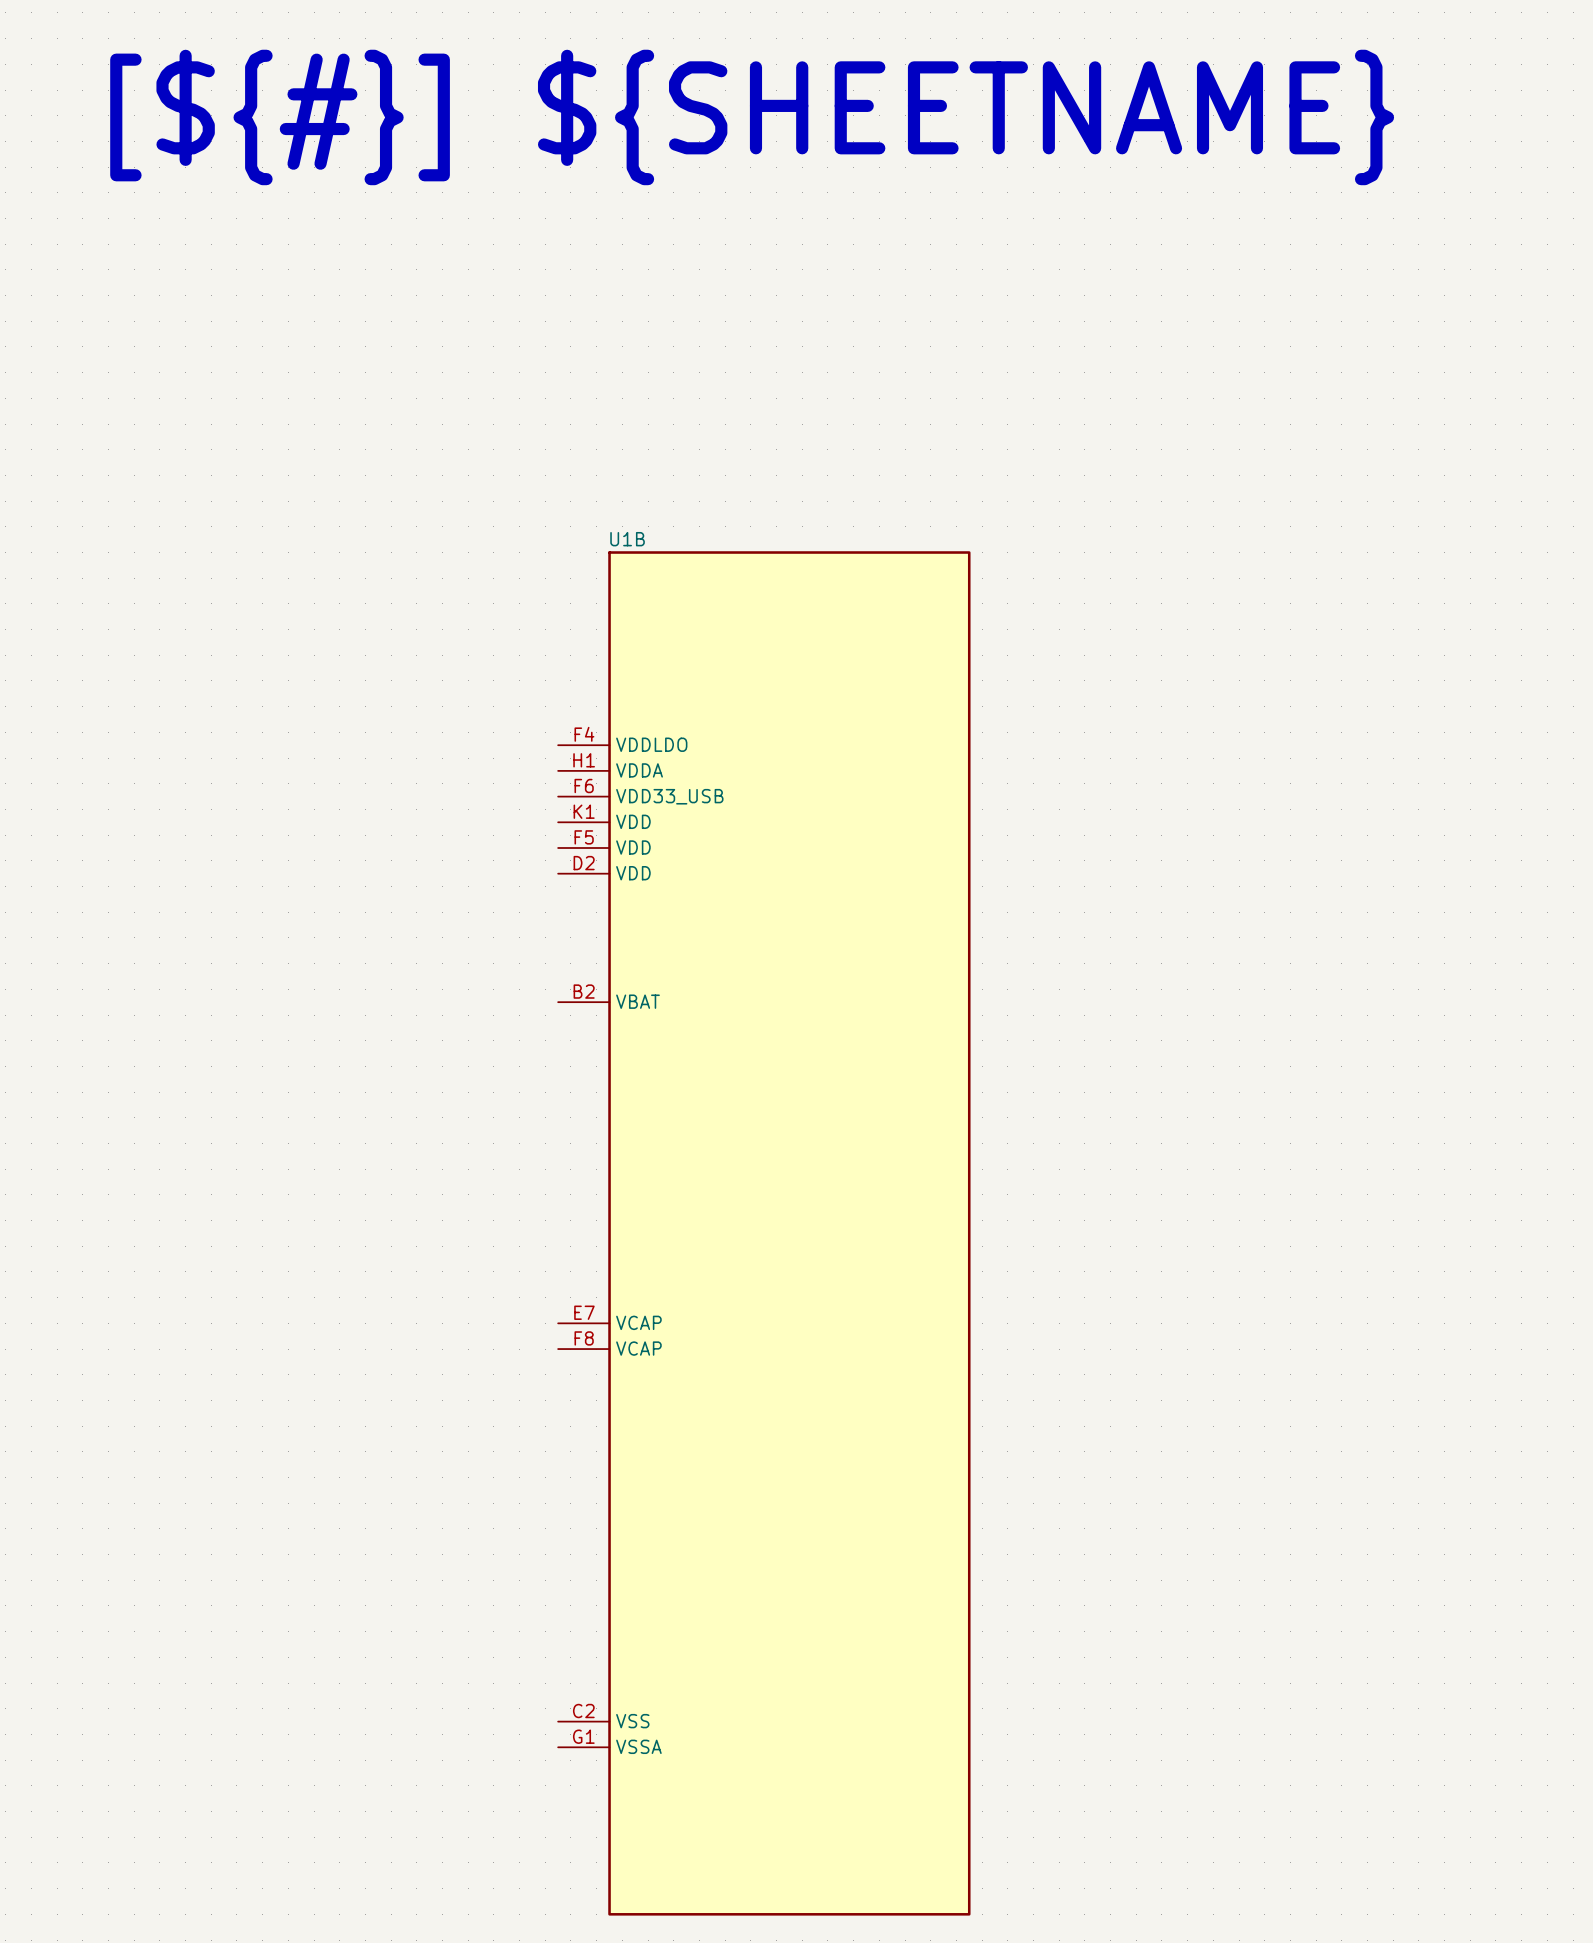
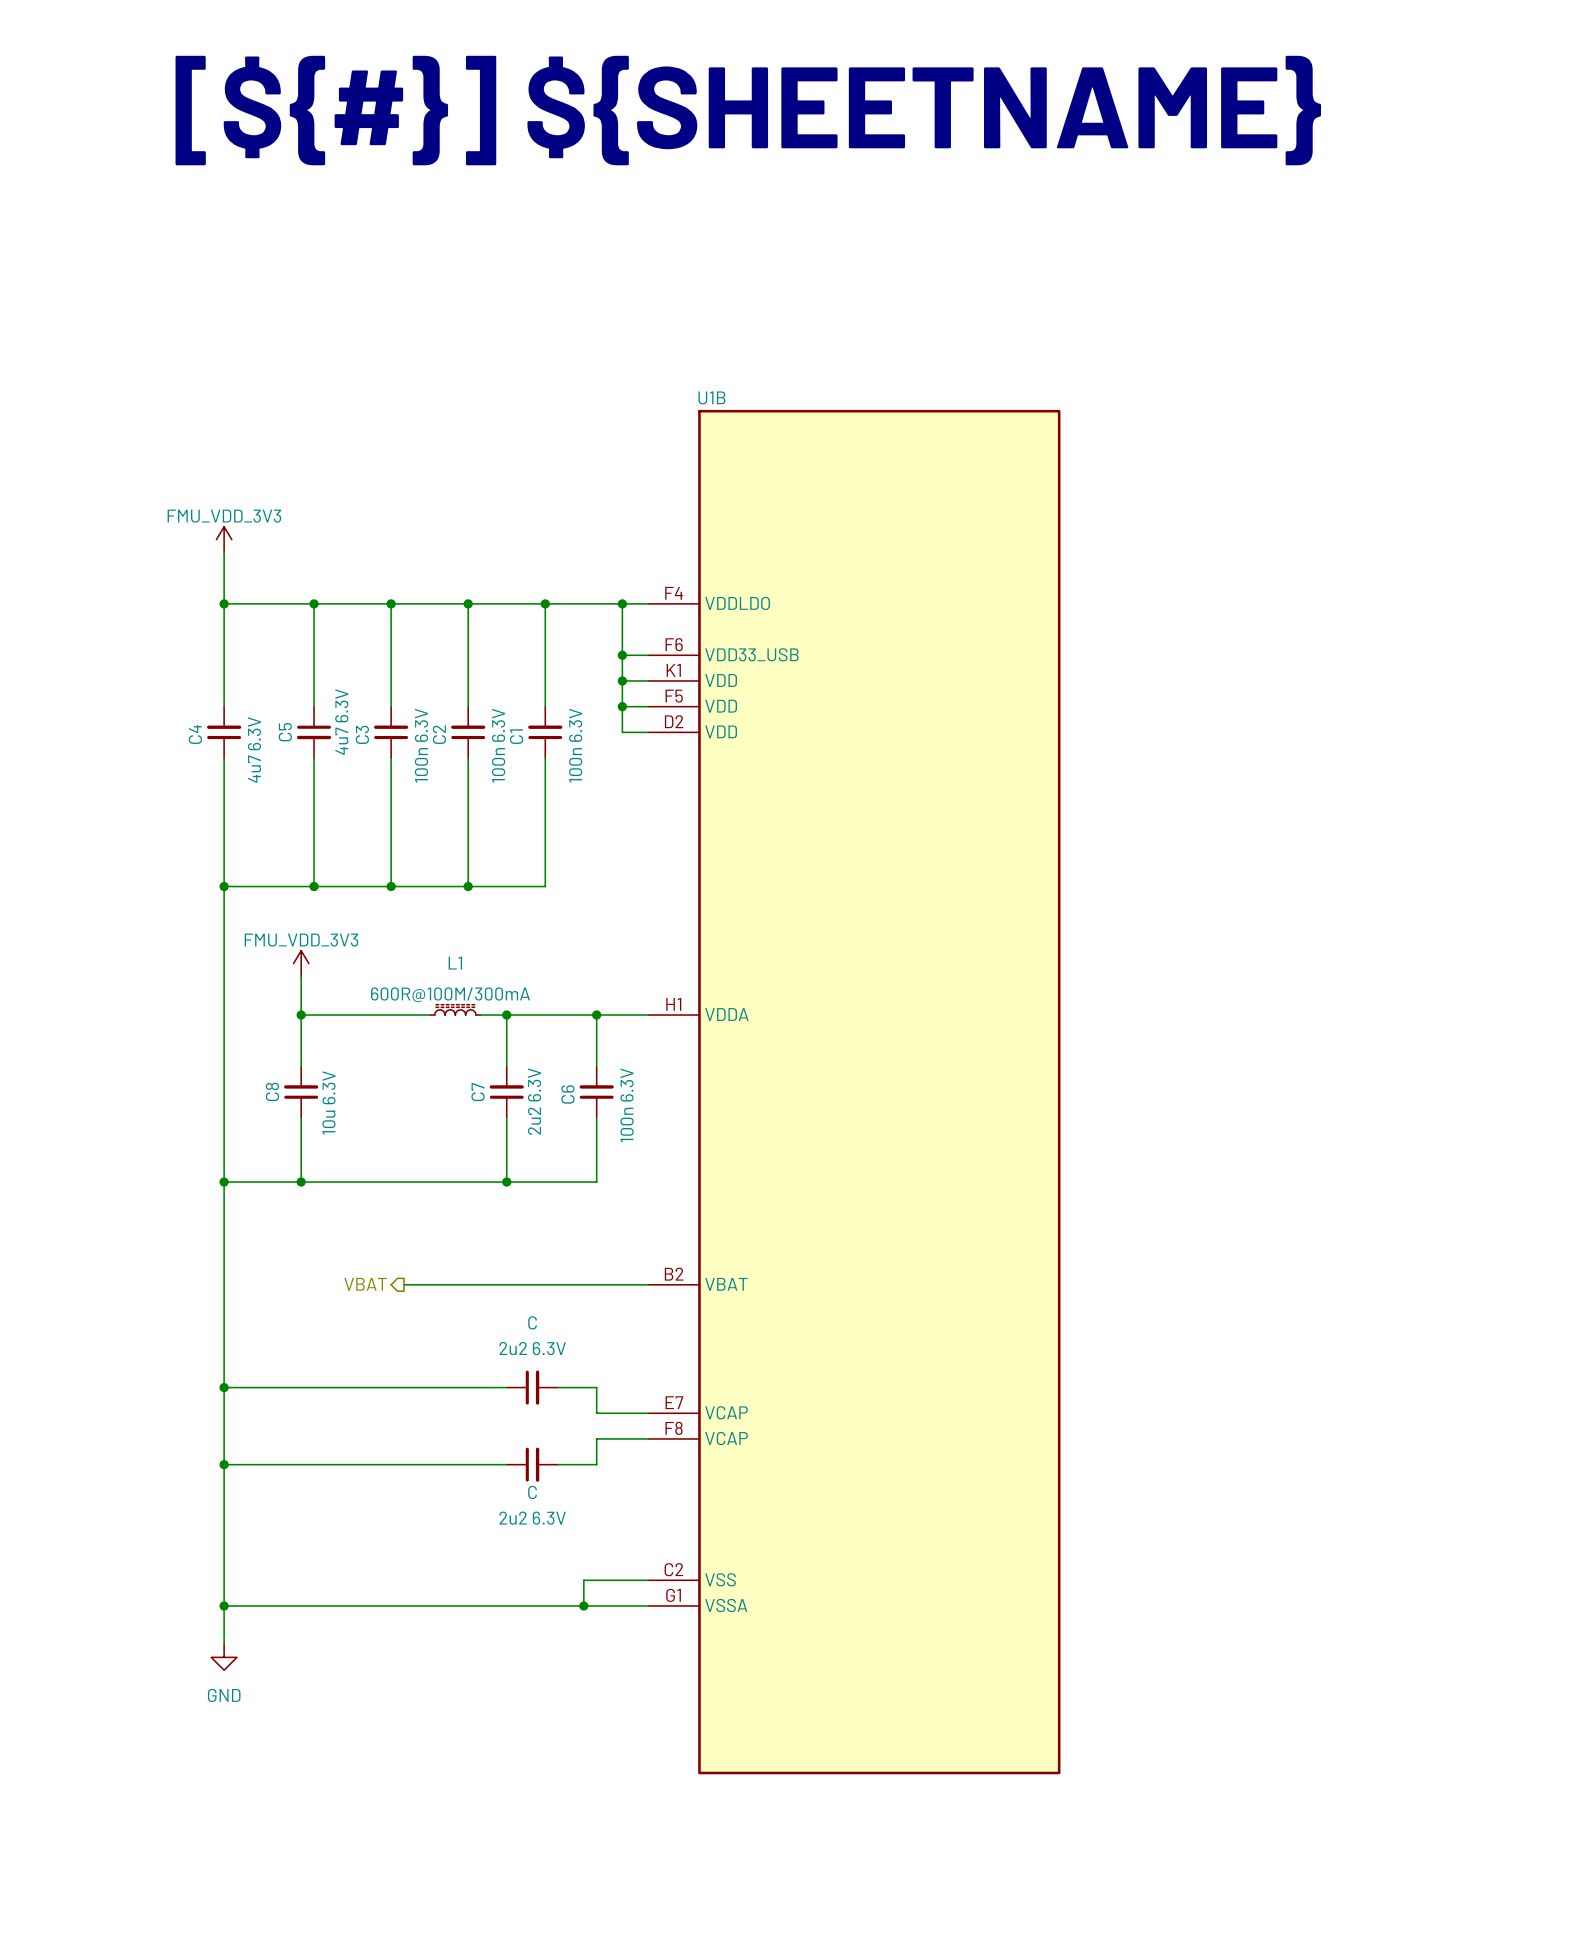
power symbol: none -> FMU_VDD_3V3 (224, 539)
U1B symbol: [558, 551, 971, 1916] -> [648, 409, 1061, 1775]
wire: none -> (224, 552) (224, 706)
wire: none -> (224, 603) (648, 603)
junction: none -> (224, 603)
wire: none -> (314, 603) (314, 706)
junction: none -> (314, 603)
wire: none -> (391, 603) (391, 706)
junction: none -> (391, 603)
wire: none -> (468, 603) (468, 706)
junction: none -> (468, 603)
wire: none -> (545, 603) (545, 706)
junction: none -> (545, 603)
junction: none -> (622, 603)
junction: none -> (622, 655)
junction: none -> (622, 680)
junction: none -> (622, 706)
C4: none -> 4u7 6.3V (224, 732)
C5: none -> 4u7 6.3V (314, 732)
C3: none -> 100n 6.3V (391, 732)
C2: none -> 100n 6.3V (468, 732)
C1: none -> 100n 6.3V (545, 732)
wire: none -> (224, 758) (224, 1644)
wire: none -> (314, 758) (314, 886)
wire: none -> (391, 758) (391, 886)
wire: none -> (468, 758) (468, 886)
wire: none -> (545, 758) (545, 886) (224, 886)
junction: none -> (224, 886)
junction: none -> (314, 886)
junction: none -> (391, 886)
junction: none -> (468, 886)
power symbol: none -> FMU_VDD_3V3 (301, 963)
wire: none -> (301, 976) (301, 1066)
L1: none -> 600R@100M/300mA (455, 1009)
wire: none -> (301, 1015) (429, 1015)
junction: none -> (301, 1015)
wire: none -> (481, 1015) (648, 1015)
wire: none -> (506, 1015) (506, 1066)
junction: none -> (506, 1015)
wire: none -> (596, 1015) (596, 1066)
junction: none -> (596, 1015)
C8: none -> 10u 6.3V (301, 1092)
C7: none -> 2u2 6.3V (506, 1092)
C6: none -> 100n 6.3V (596, 1092)
wire: none -> (301, 1117) (301, 1182)
wire: none -> (506, 1117) (506, 1182)
wire: none -> (596, 1117) (596, 1182) (224, 1182)
junction: none -> (224, 1182)
junction: none -> (301, 1182)
junction: none -> (506, 1182)
hierarchical label: none -> VBAT (365, 1284)
wire: none -> (403, 1284) (648, 1284)
wire: none -> (224, 1387) (506, 1387)
junction: none -> (224, 1387)
C: none -> 2u2 6.3V (532, 1387)
wire: none -> (558, 1387) (596, 1387) (596, 1413) (648, 1413)
wire: none -> (648, 1438) (596, 1438) (596, 1464) (558, 1464)
wire: none -> (224, 1464) (506, 1464)
junction: none -> (224, 1464)
C: none -> 2u2 6.3V (532, 1464)
wire: none -> (648, 1580) (583, 1580) (583, 1605)
wire: none -> (224, 1605) (648, 1605)
junction: none -> (224, 1605)
junction: none -> (583, 1605)
power symbol: none -> GND (224, 1657)

